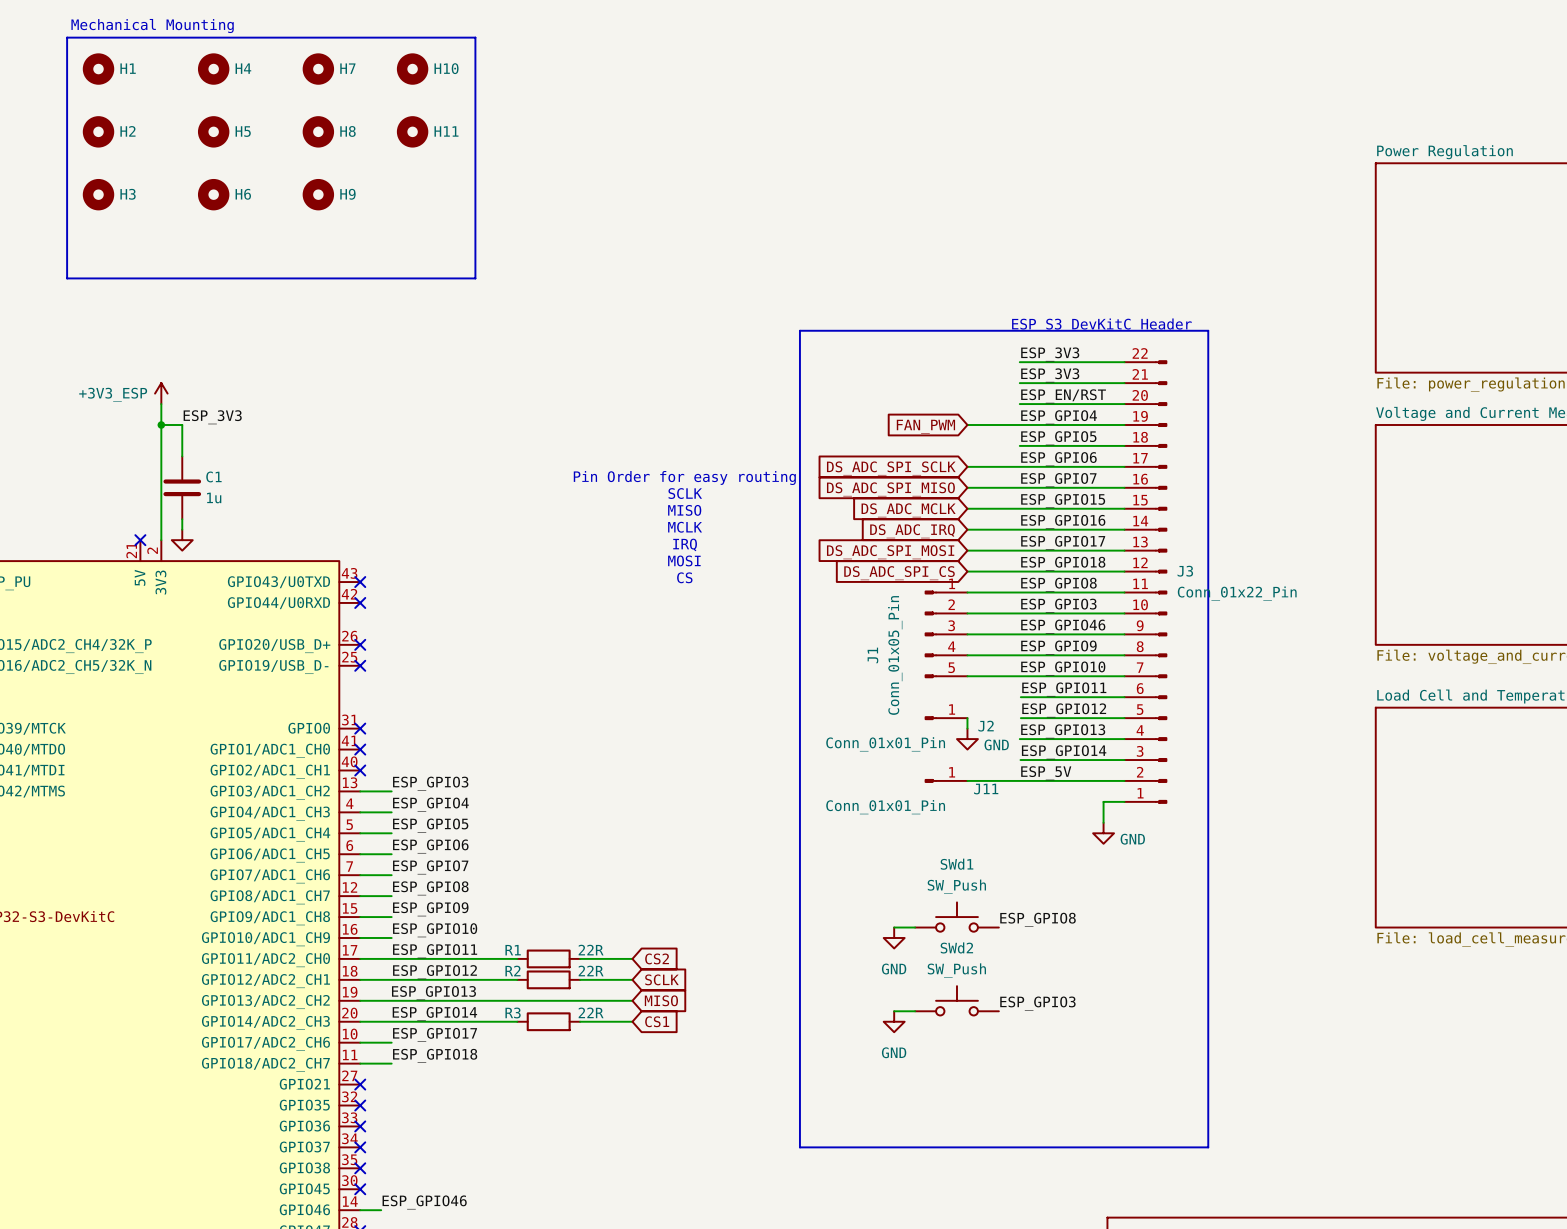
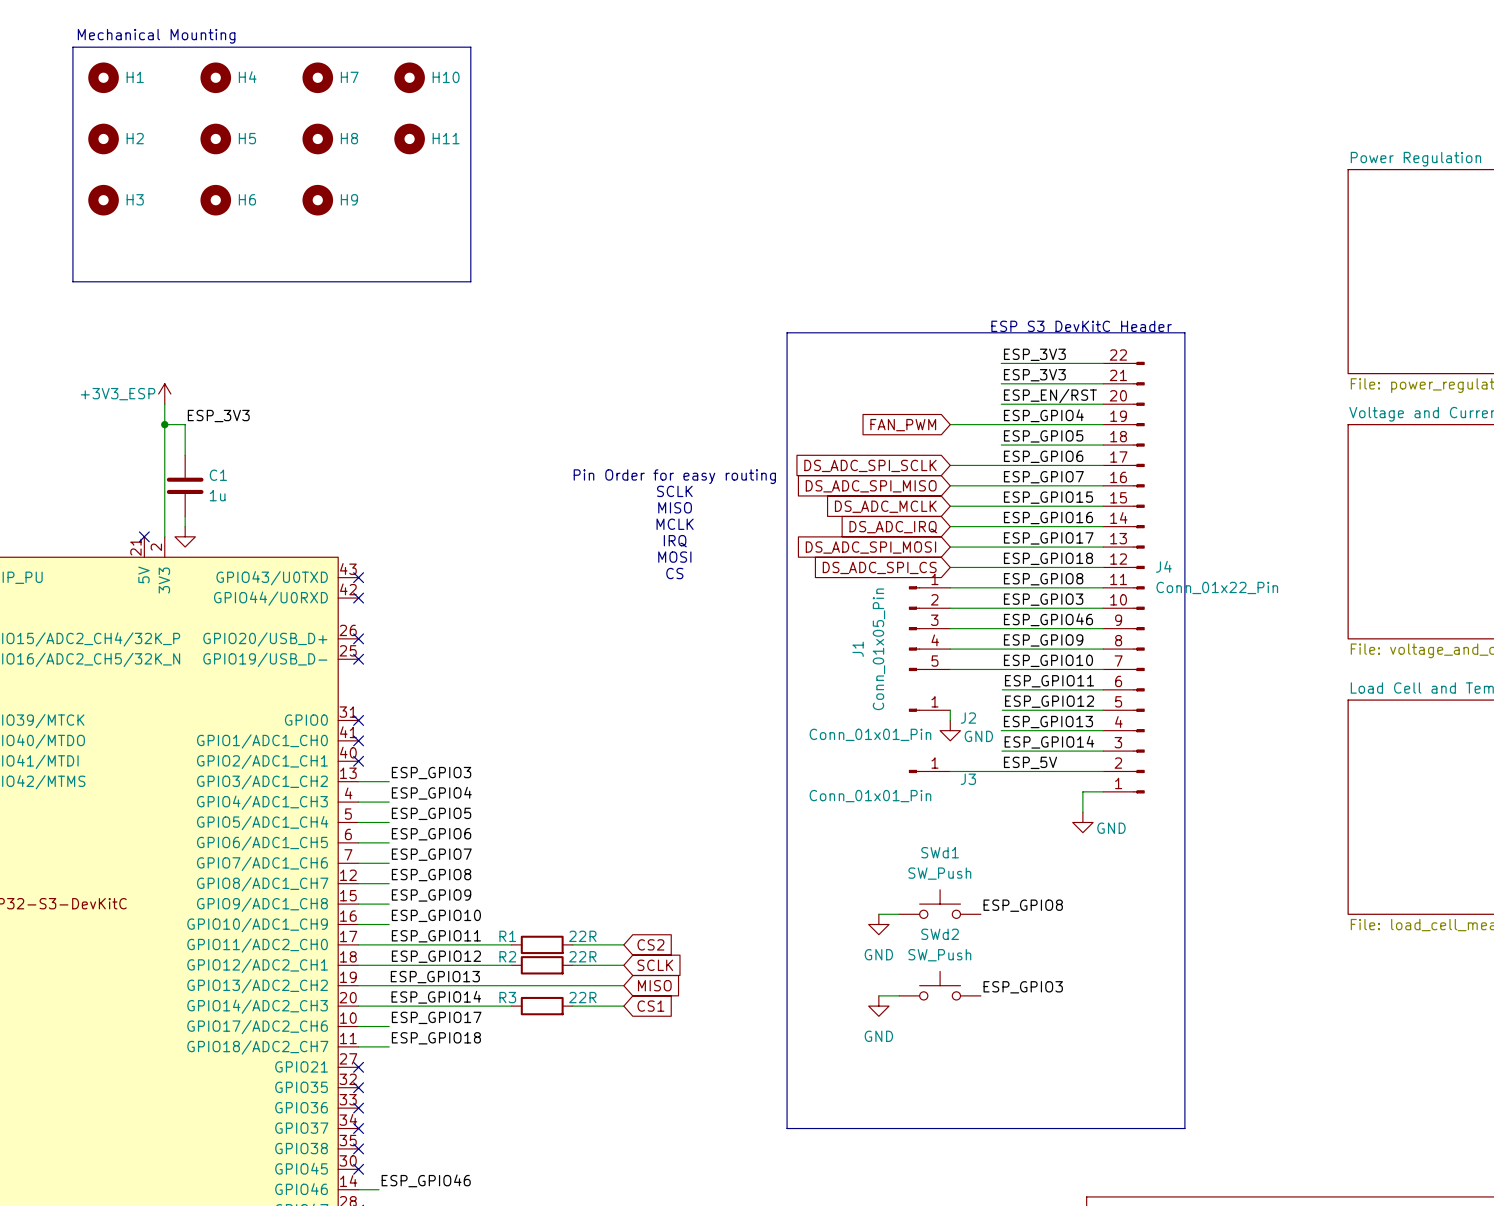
J3 name: J3 (1185, 571) -> J4 (1163, 566)
J11 name: J11 (986, 789) -> J3 (968, 779)

